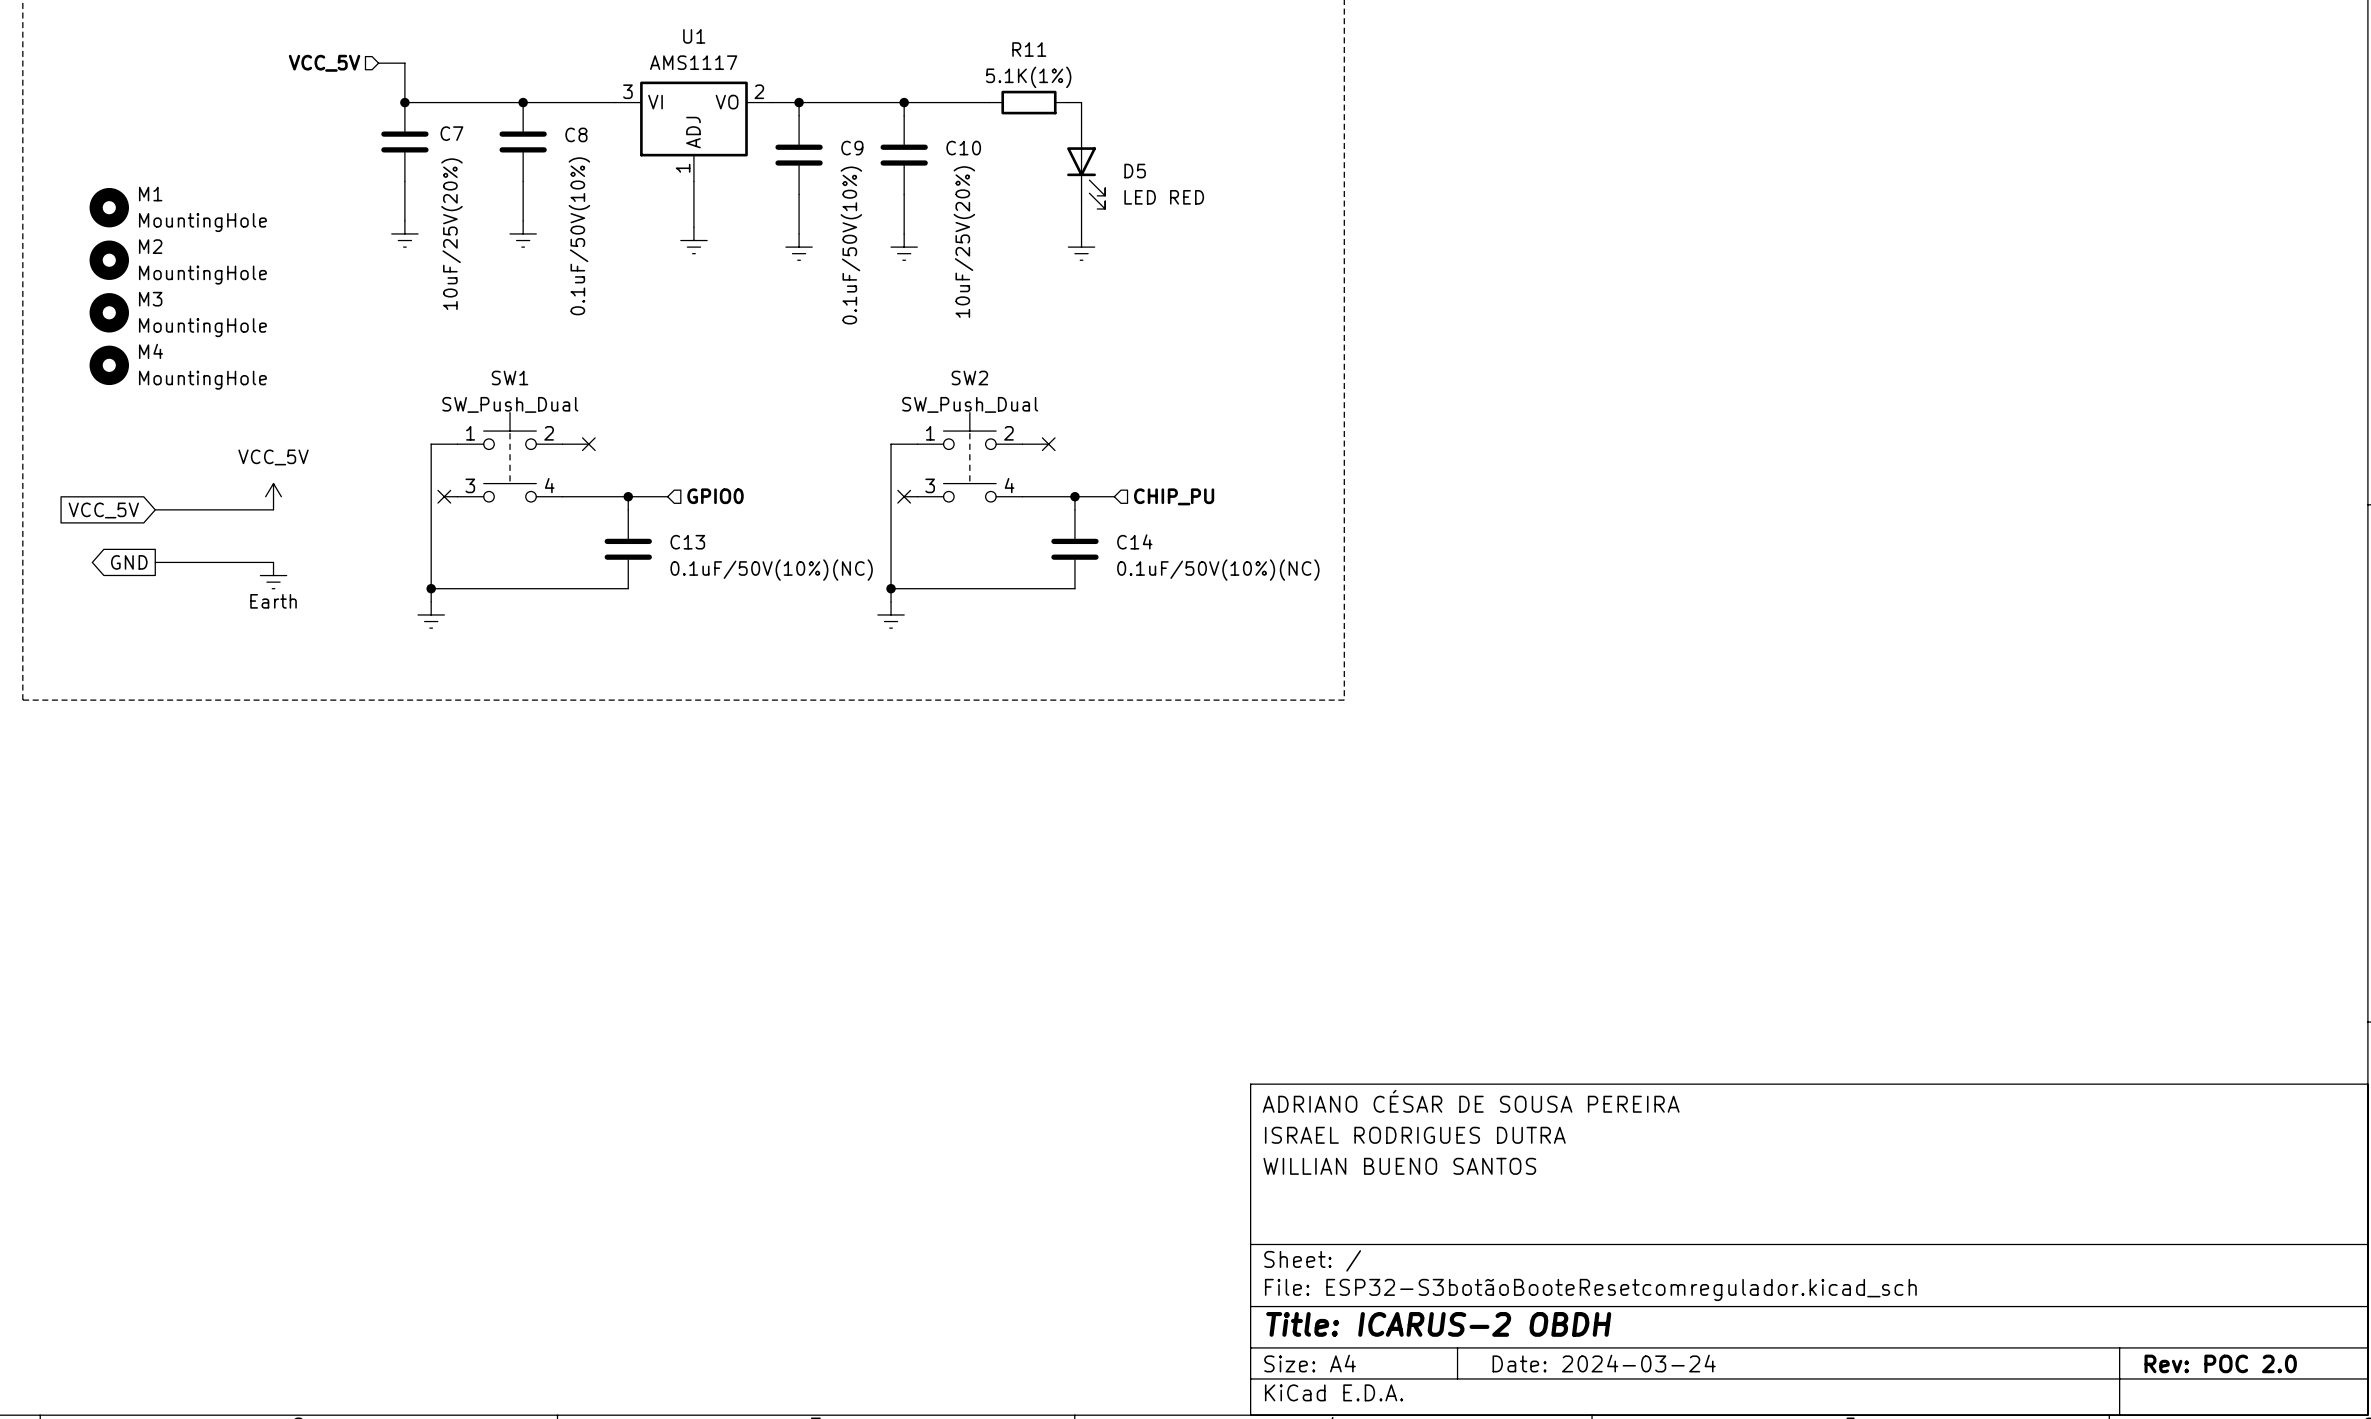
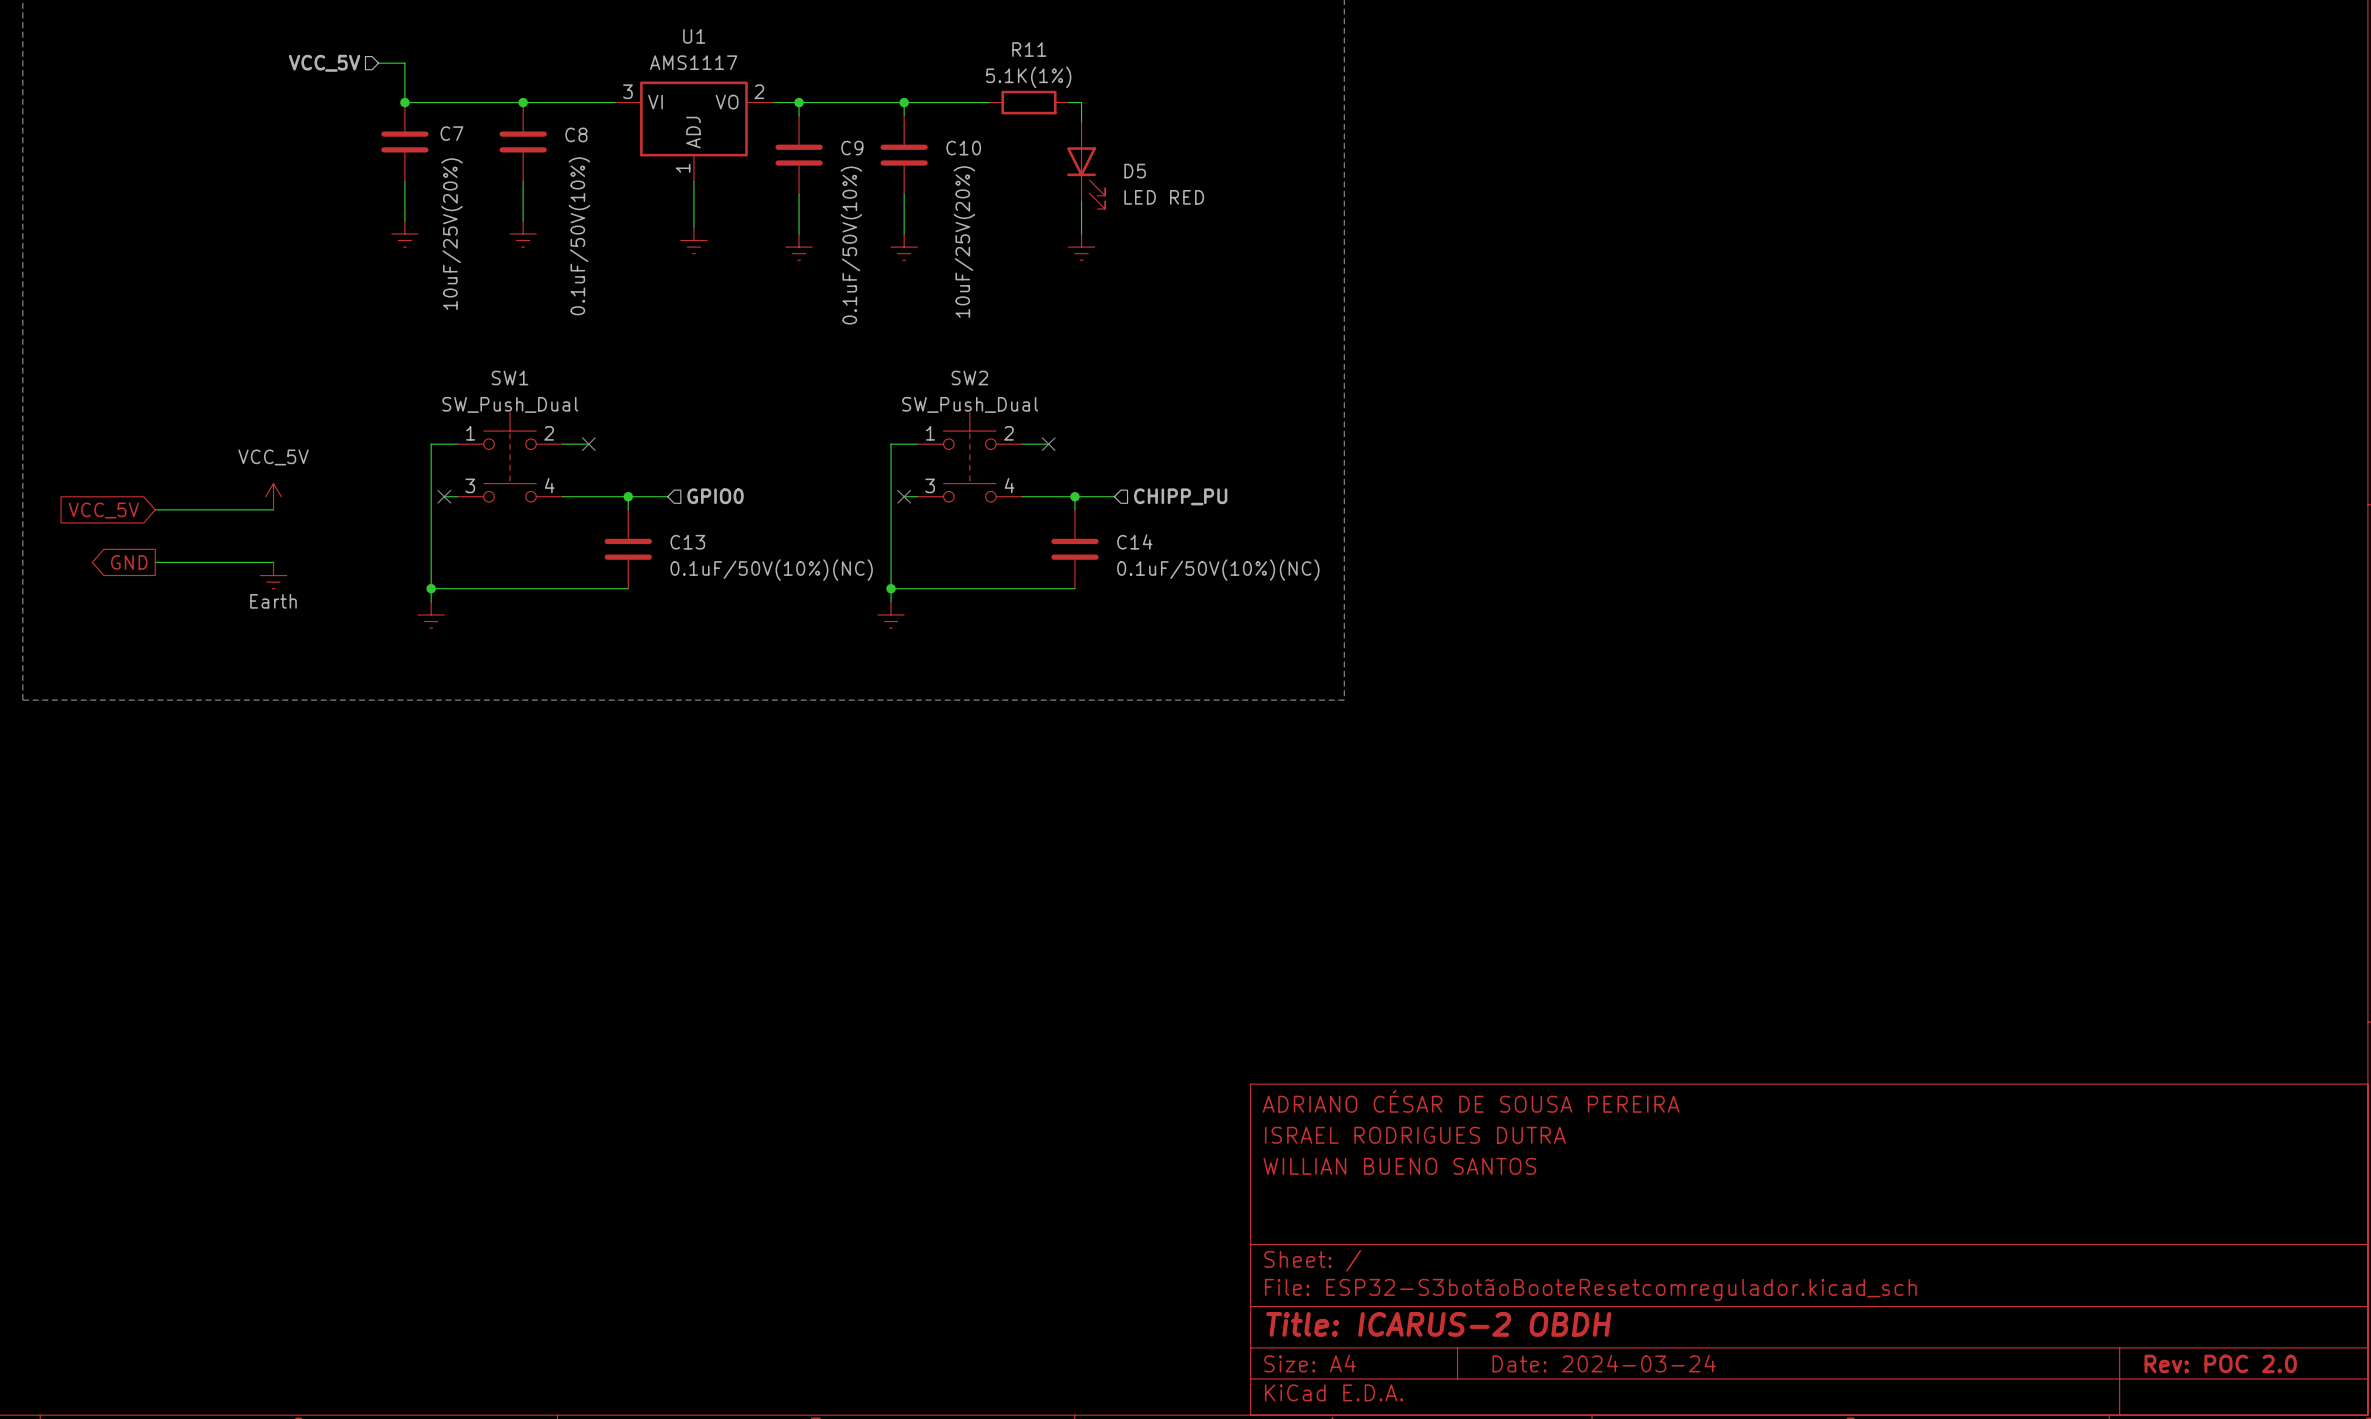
M1: MountingHole (109, 207) -> none
M2: MountingHole (109, 260) -> none
M3: MountingHole (109, 312) -> none
M4: MountingHole (109, 365) -> none
hierarchical label: CHIP_PU (1174, 496) -> CHIPP_PU (1180, 496)

